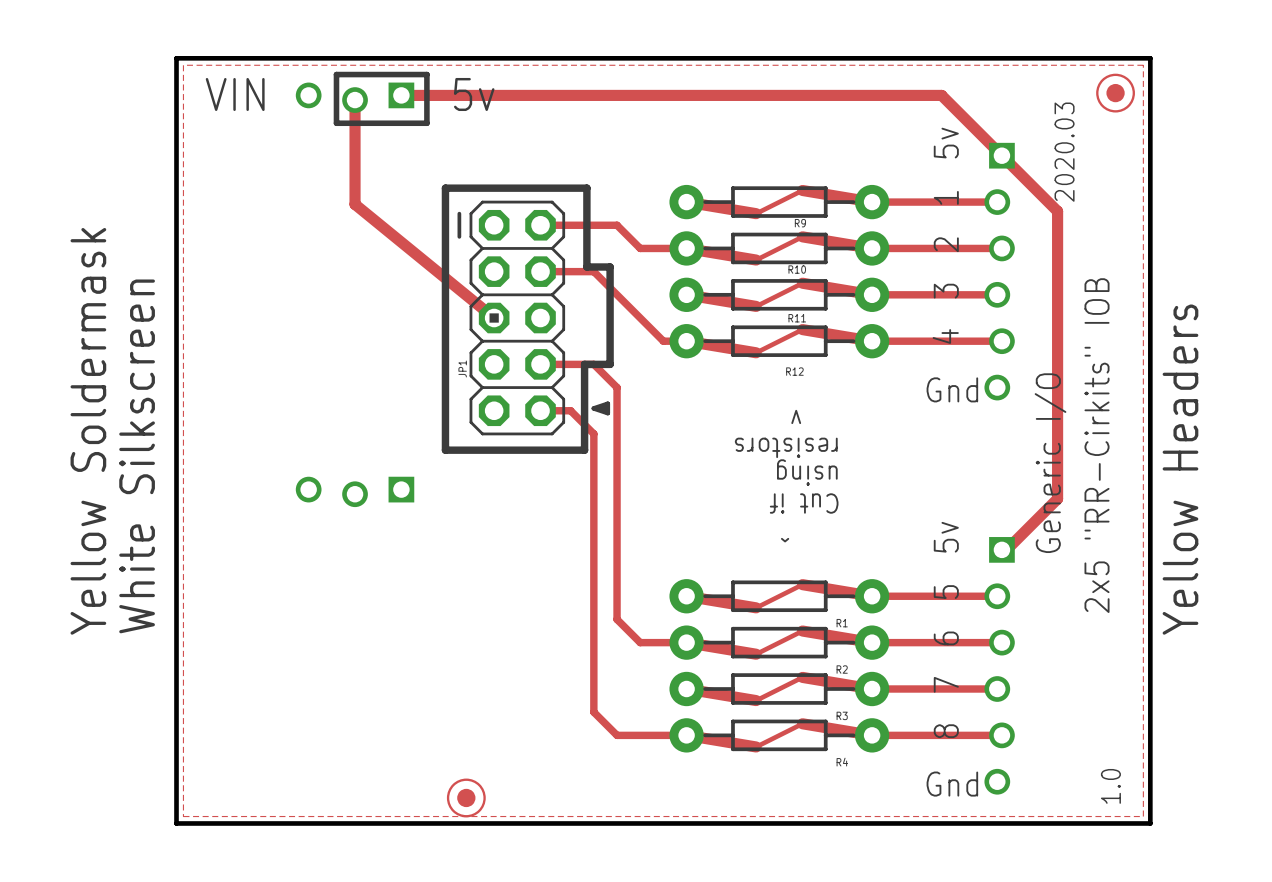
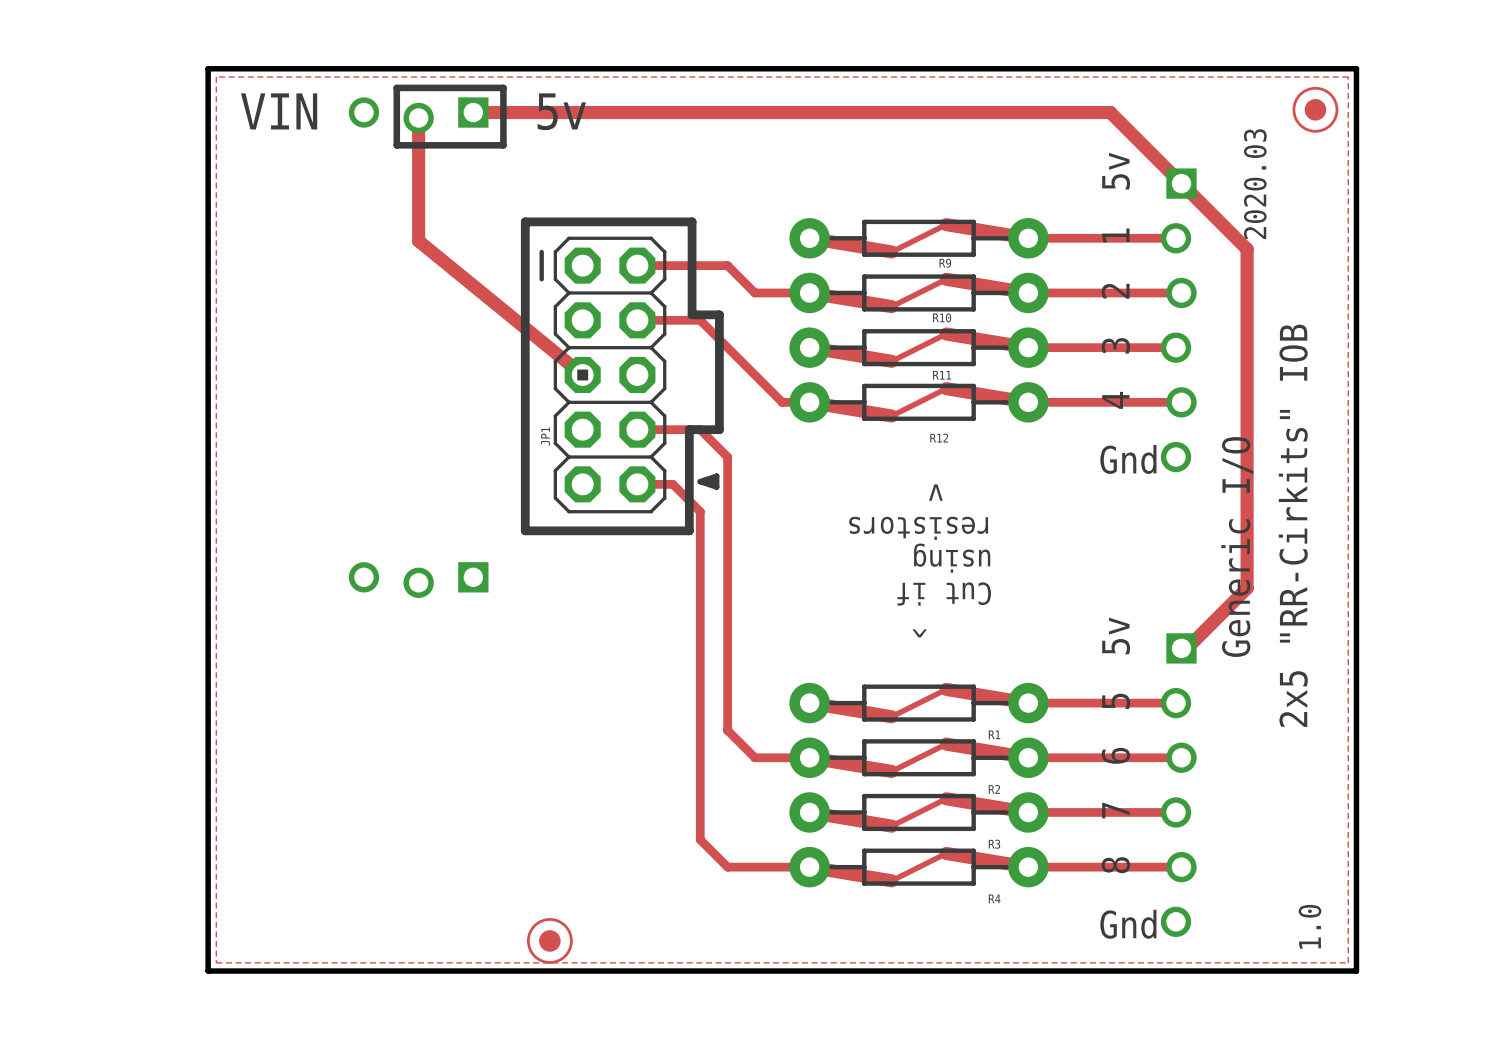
text: Yellow Soldermask (88, 431) -> none
text: White Silkscreen (137, 456) -> none
text: Yellow Headers (1180, 469) -> none

